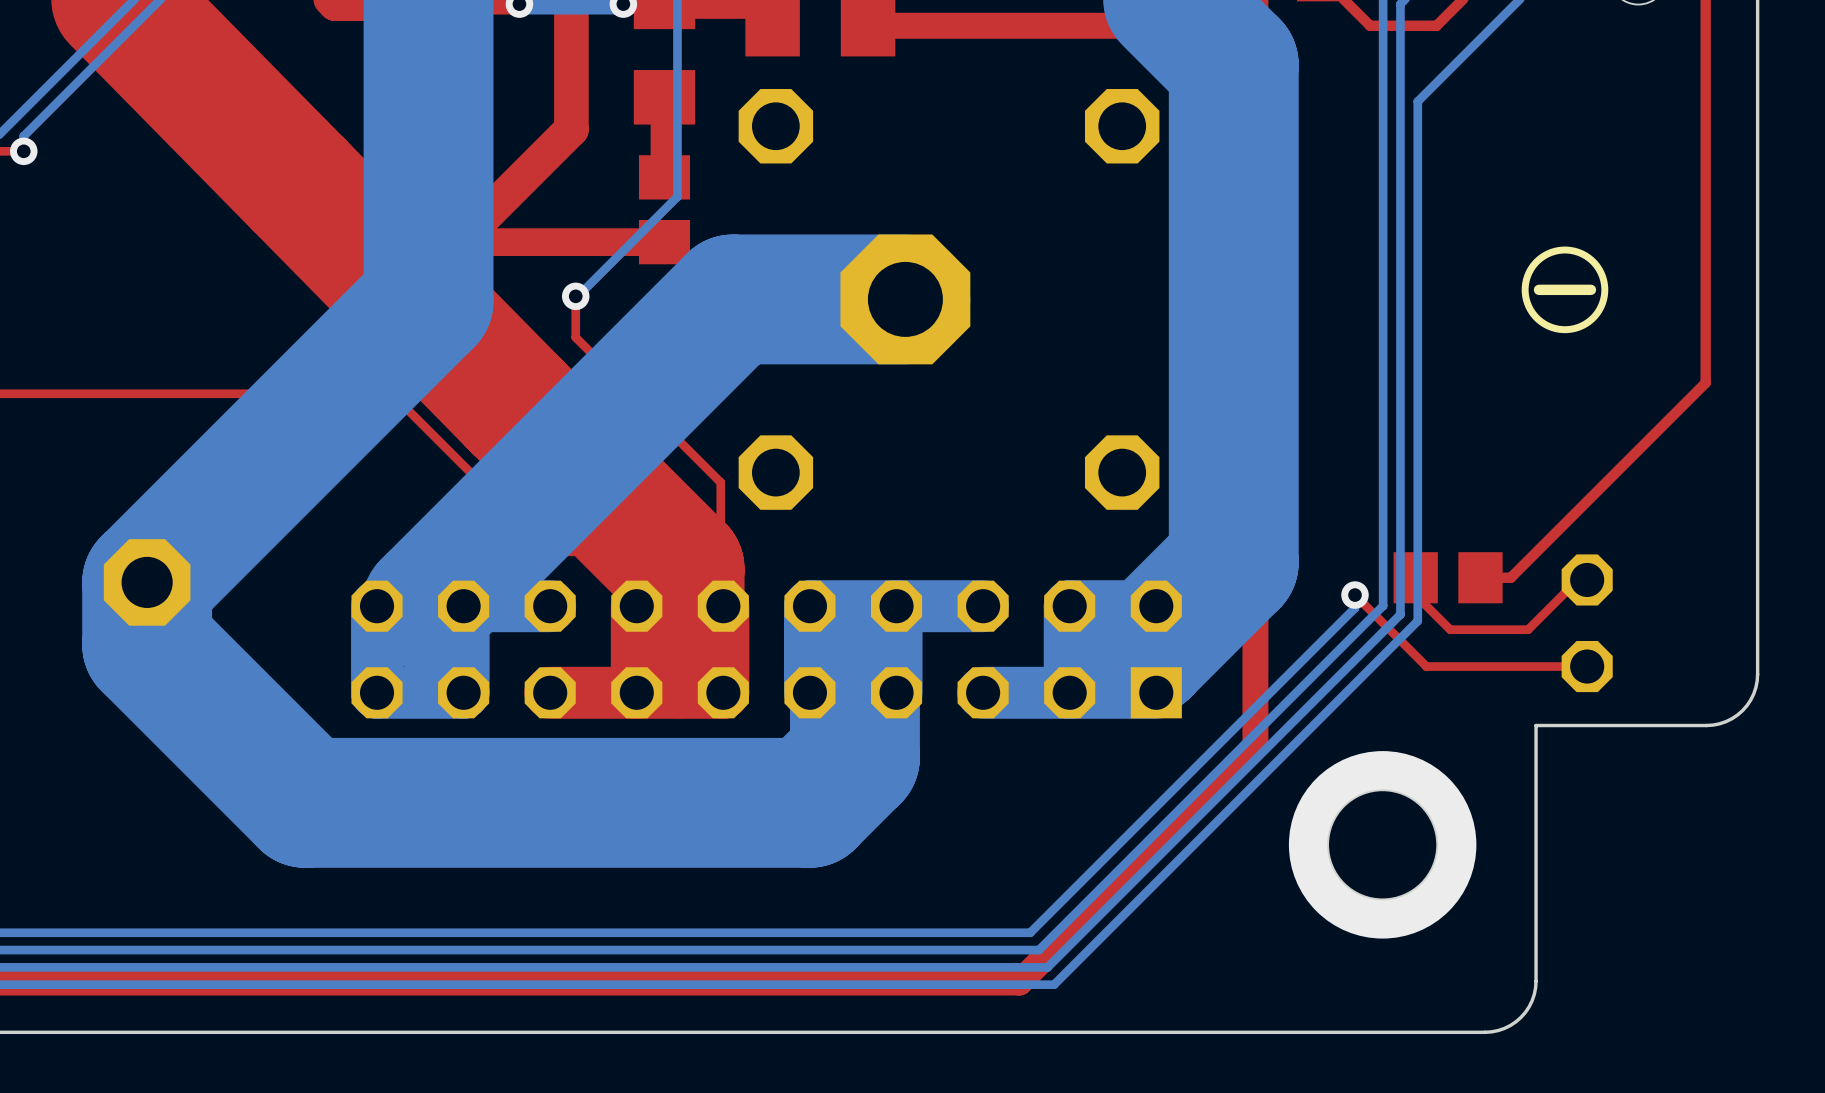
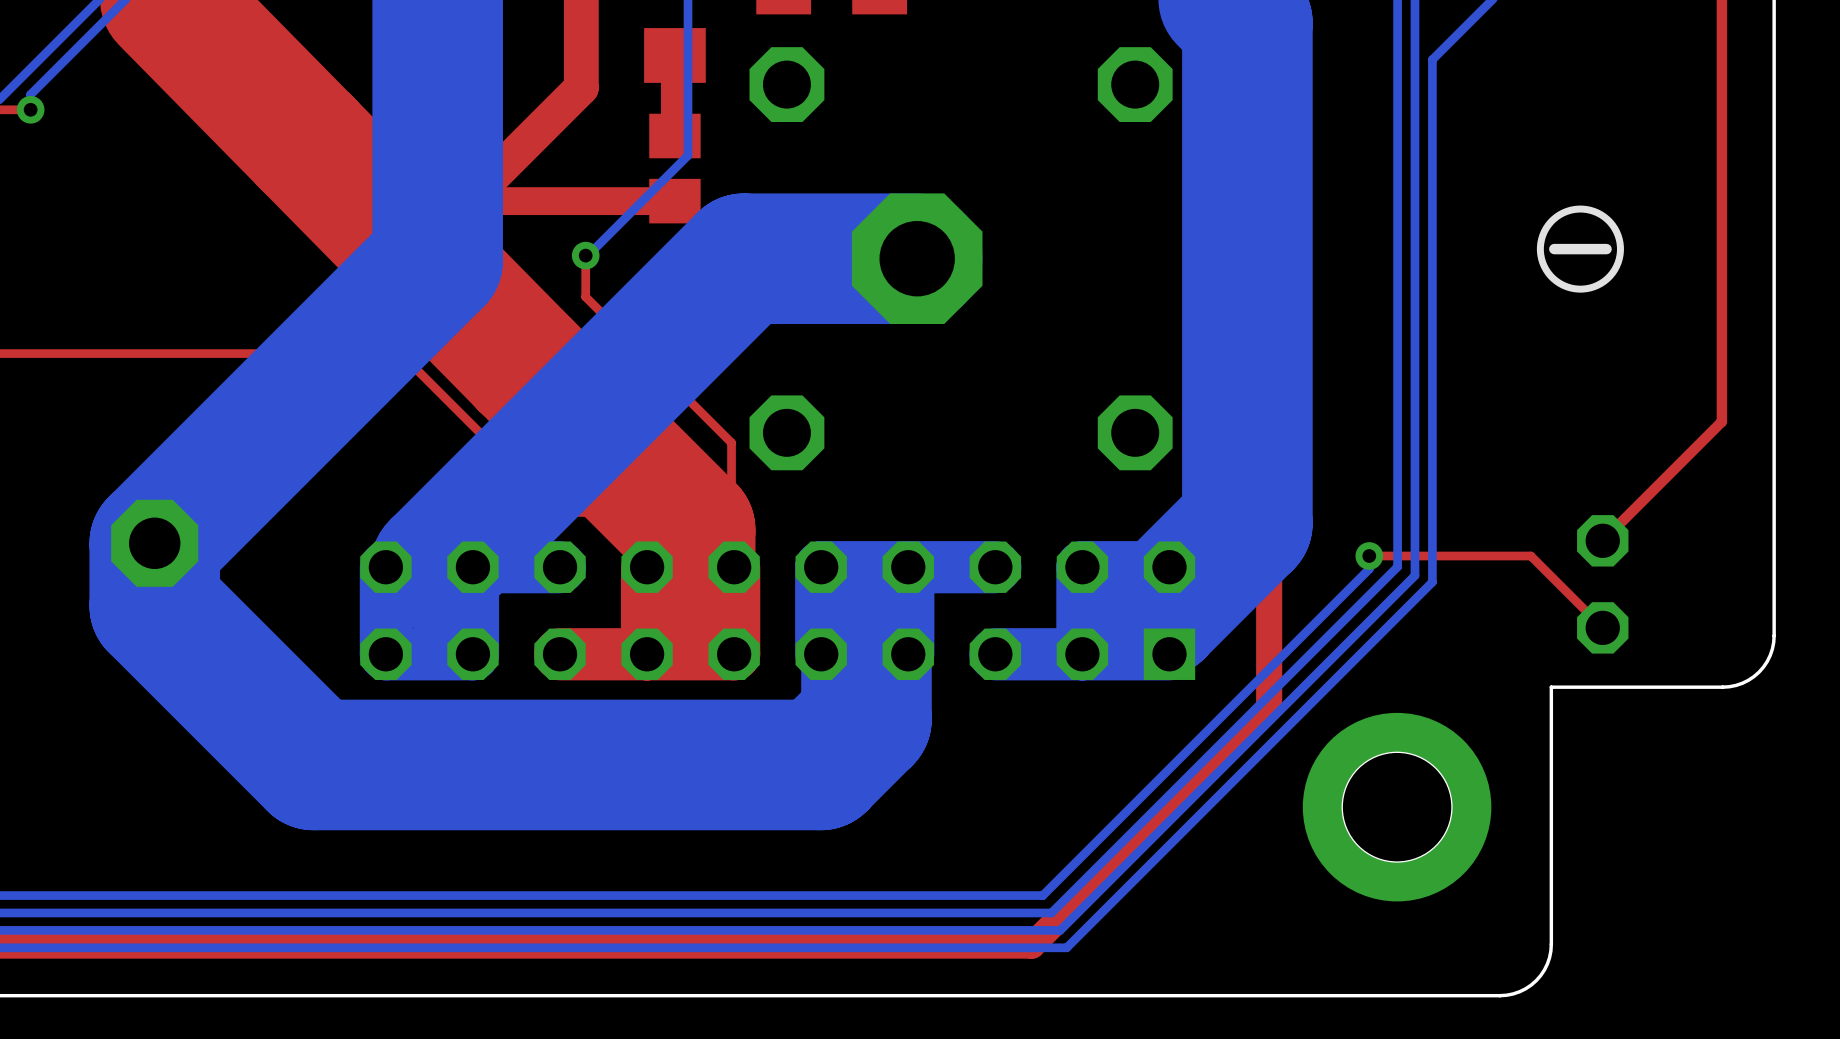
top track: (1705, 382) (1510, 577) (1480, 577) -> (1721, 342) (1721, 421) (1602, 540)
top track: (1415, 577) (1415, 595) (1450, 629) (1528, 629) (1577, 579) (1587, 579) -> none
part: (1448, 577) -> none
top track: (1355, 595) (1426, 666) (1587, 666) -> (1369, 556) (1530, 556) (1602, 627)

